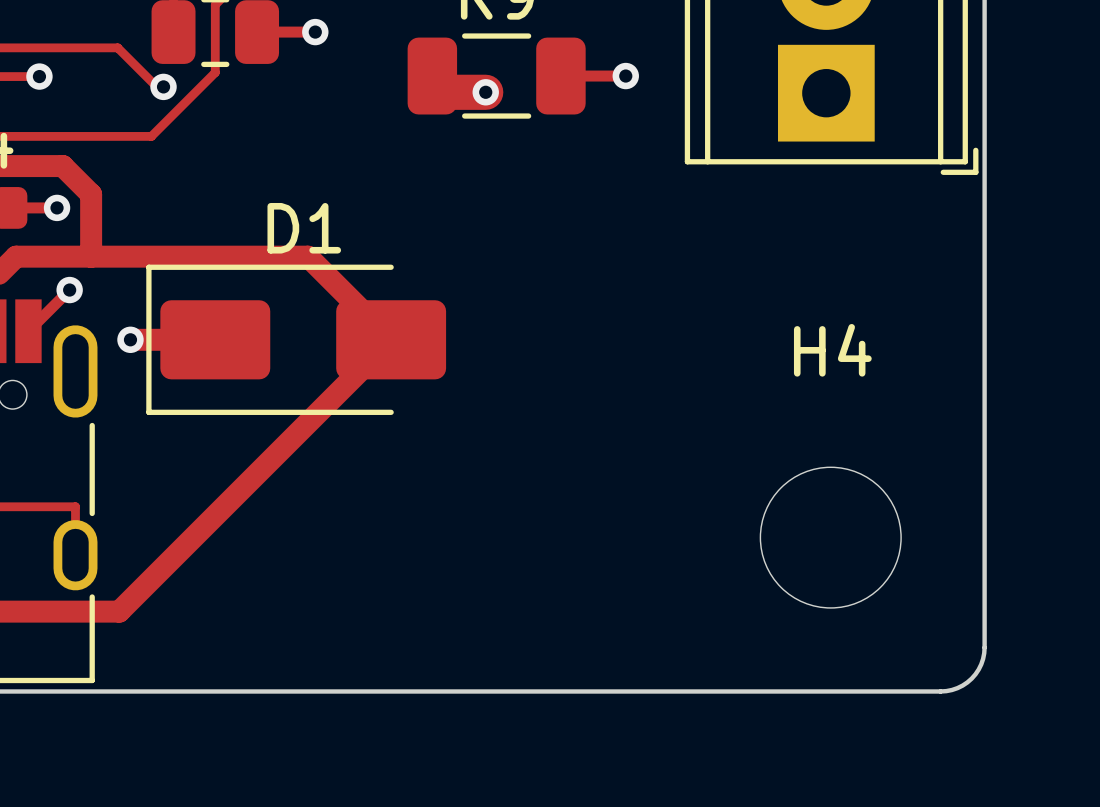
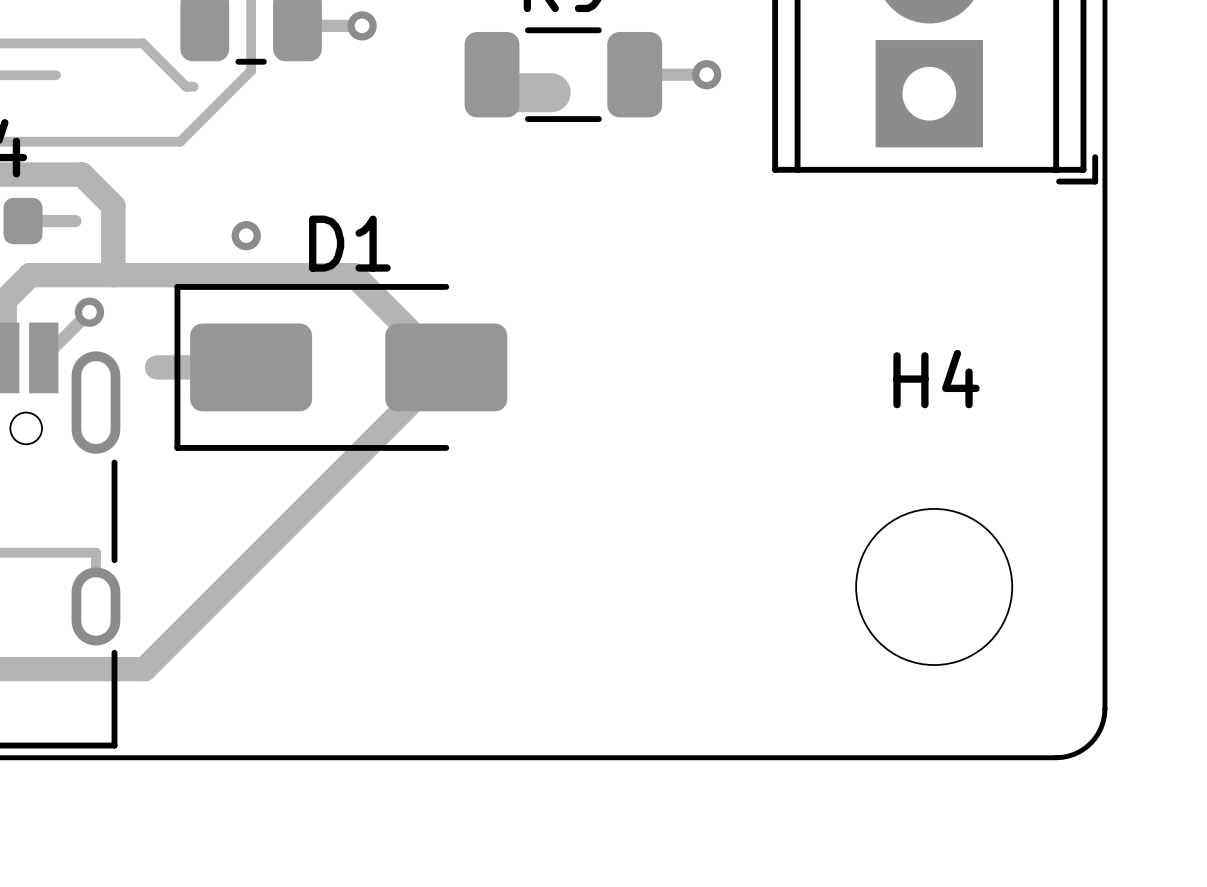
via: (39, 76) -> none
via: (163, 86) -> none
via: (485, 92) -> none
via: (57, 207) -> none
via: none -> (246, 235)
via: (130, 339) -> none

